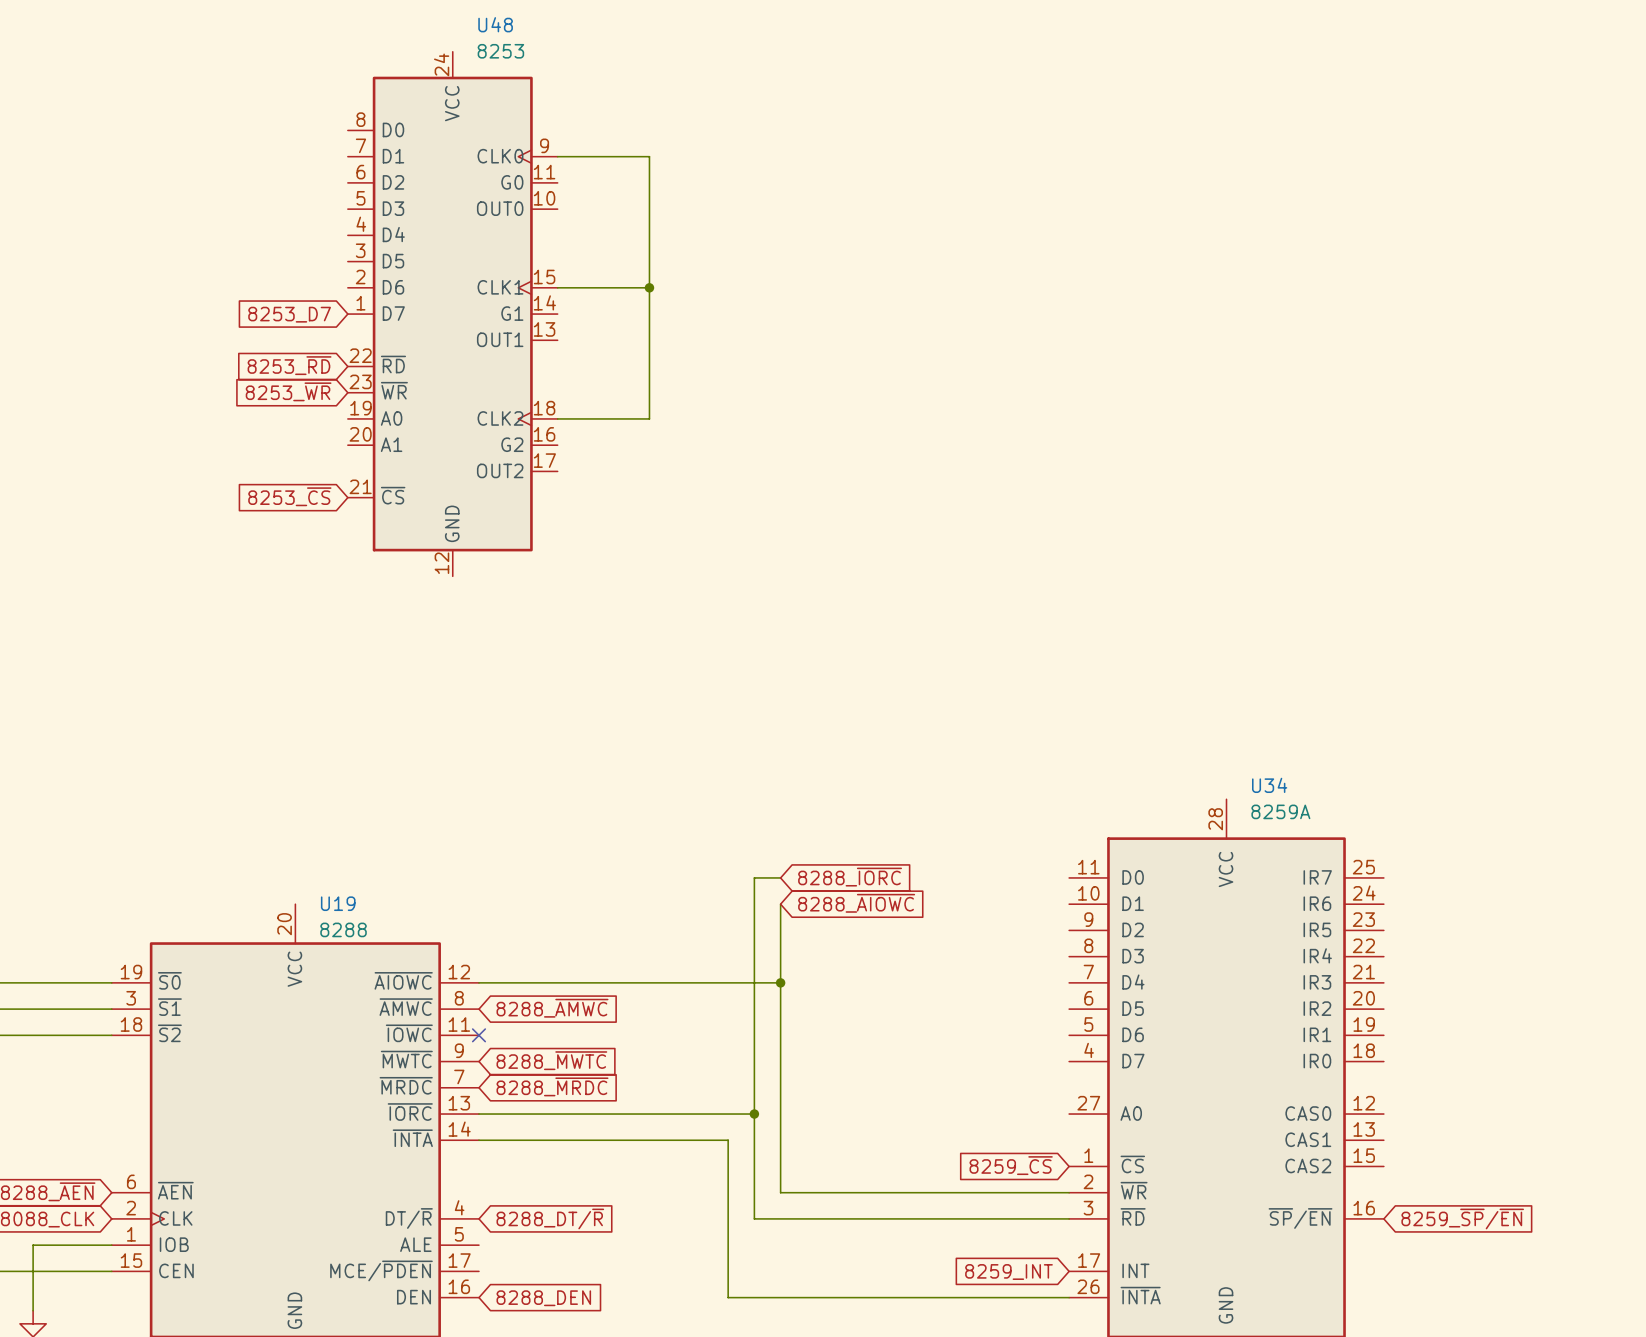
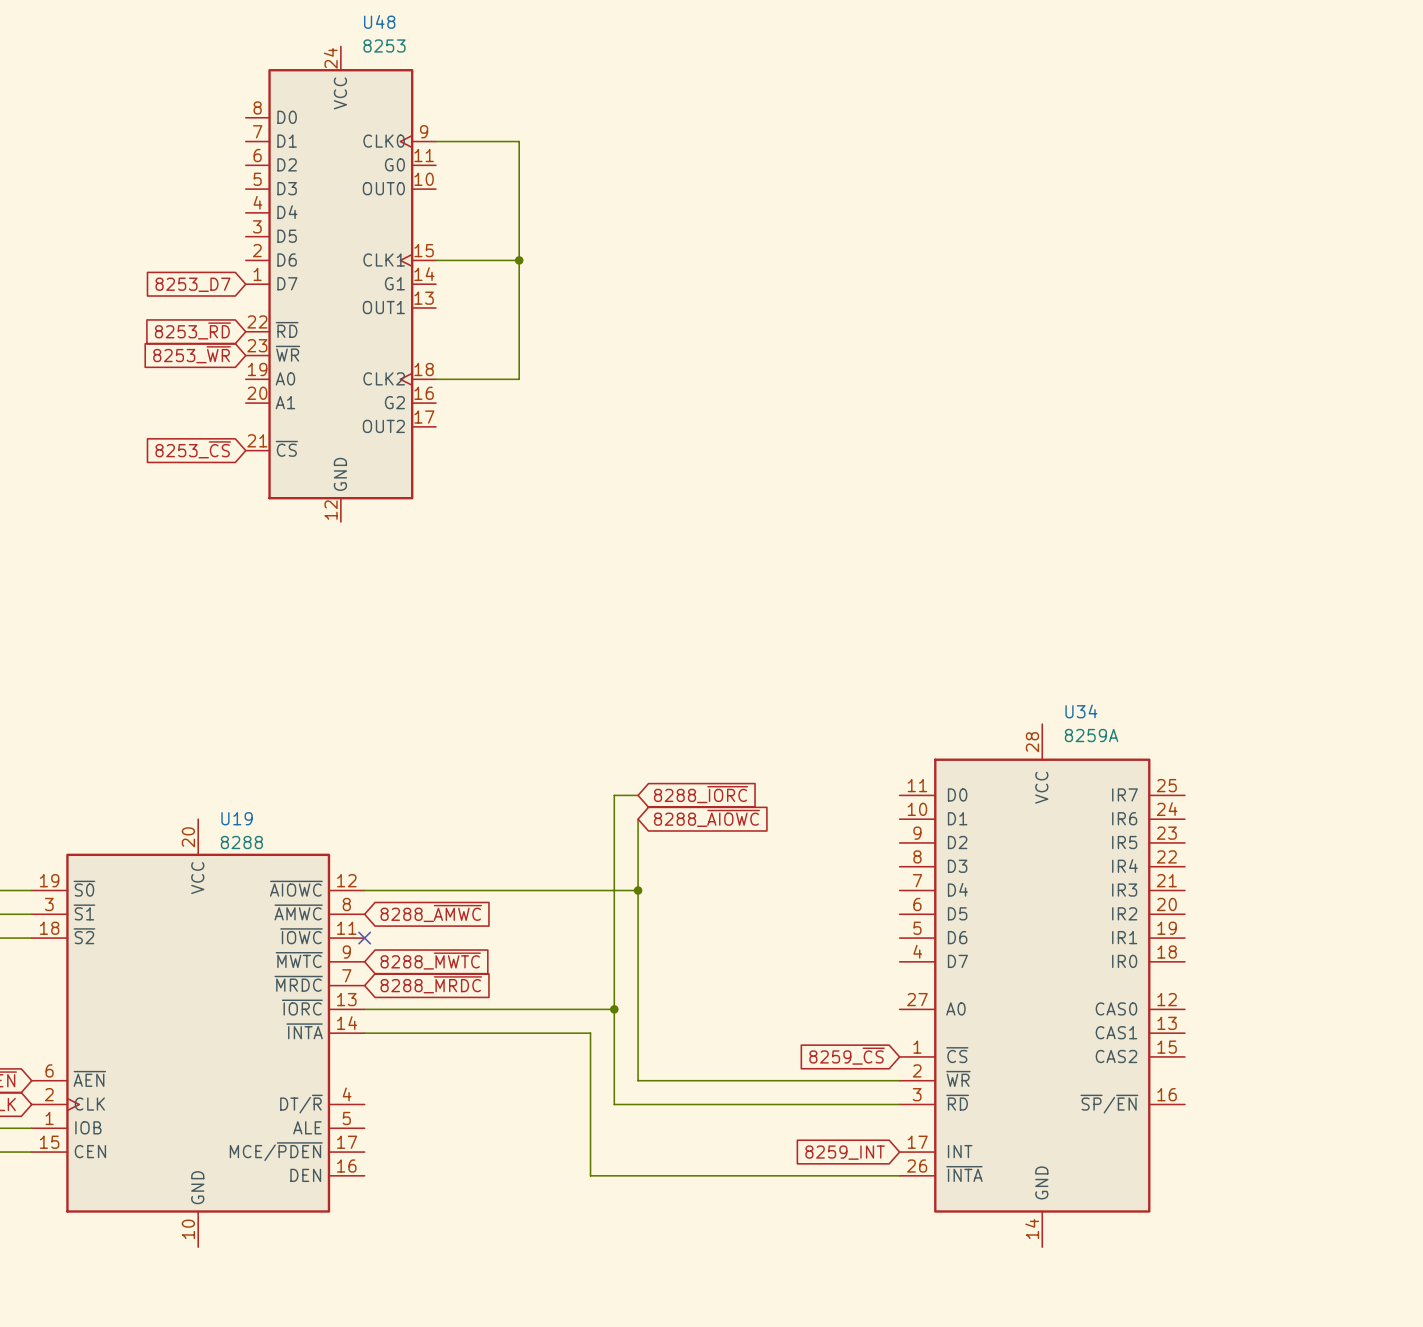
global label: 8288_DT/~{R} (550, 1218) -> none
global label: 8259_~{SP}/~{EN} (1462, 1218) -> none
global label: 8288_DEN (543, 1298) -> none

